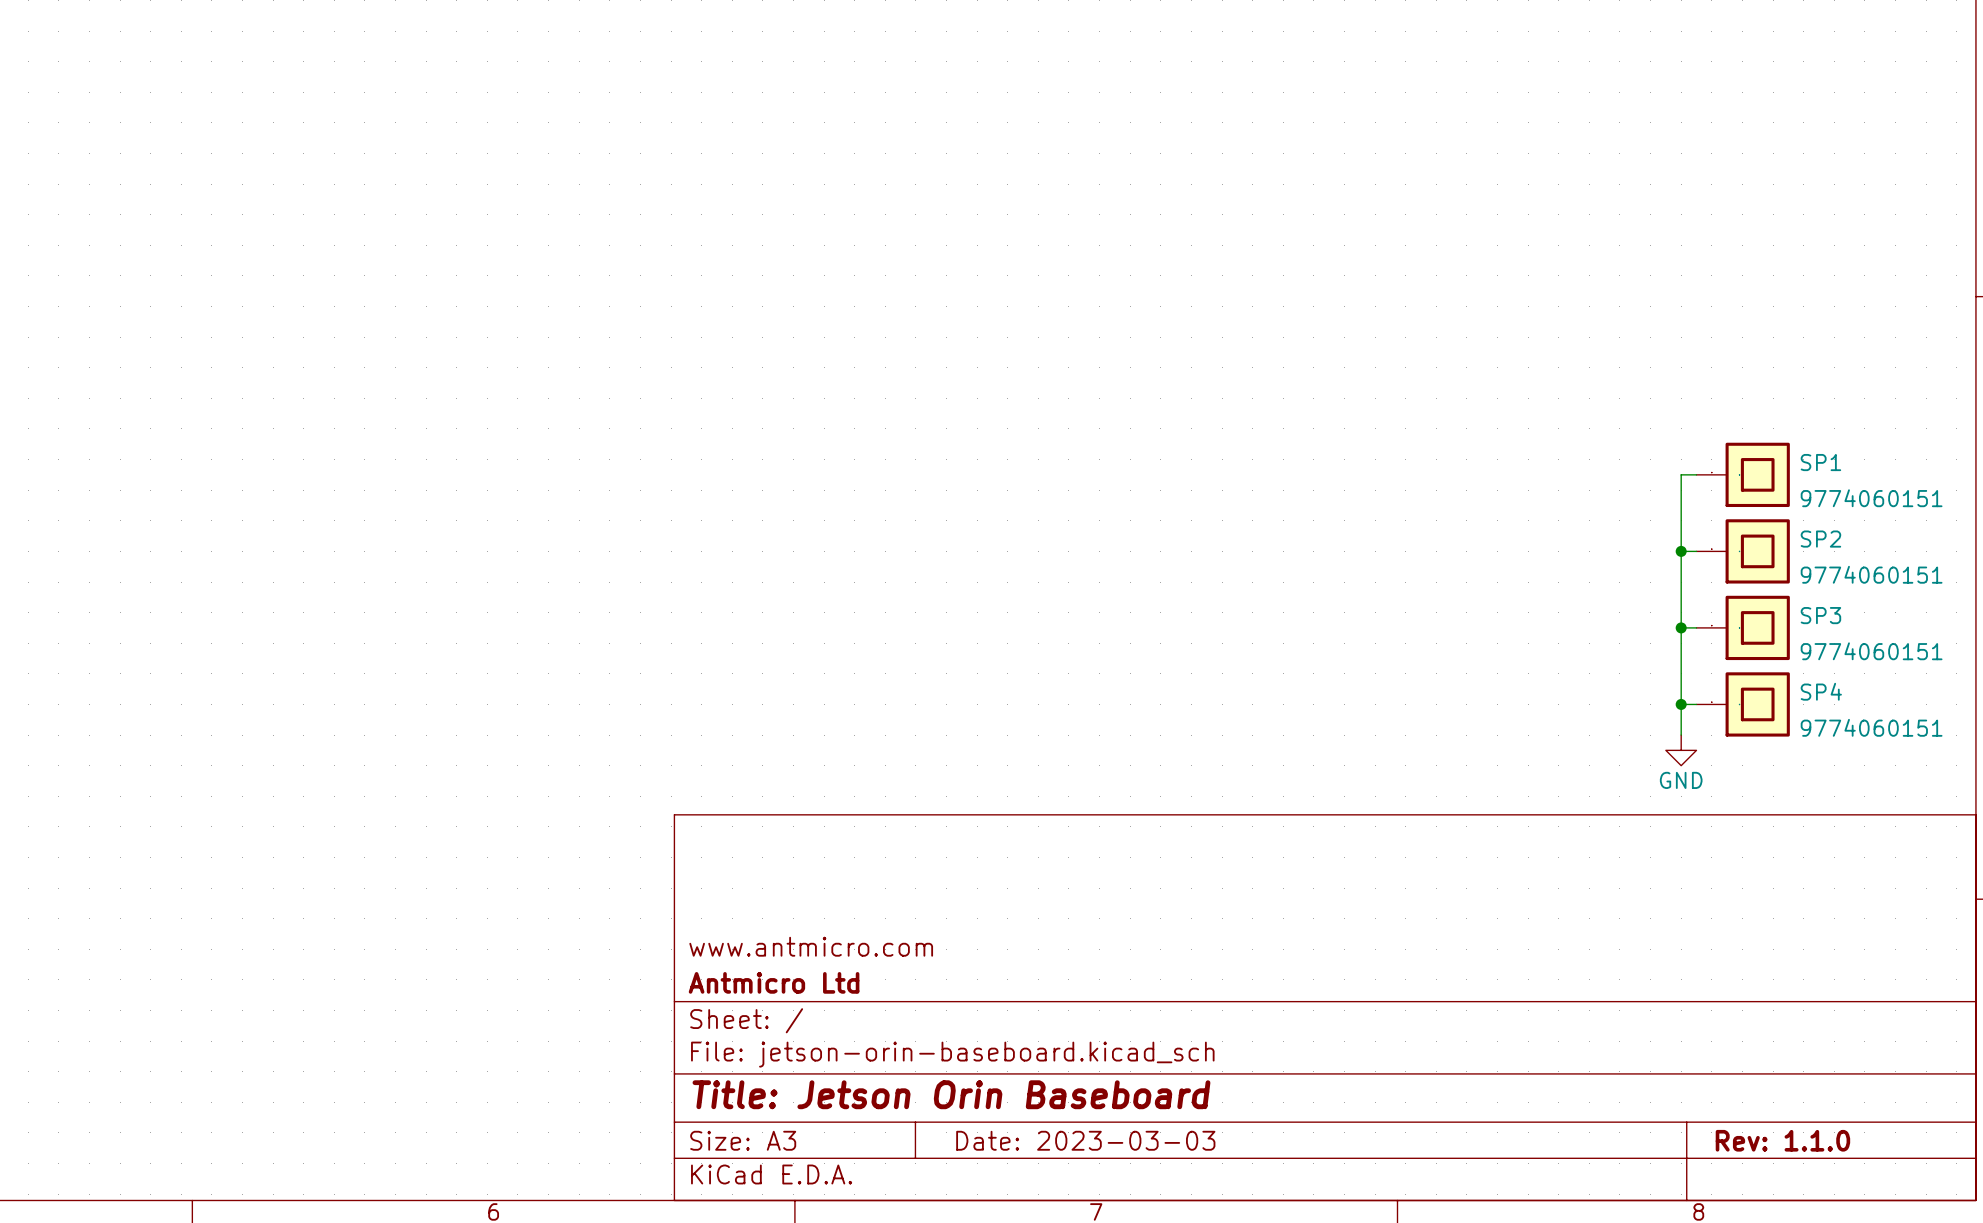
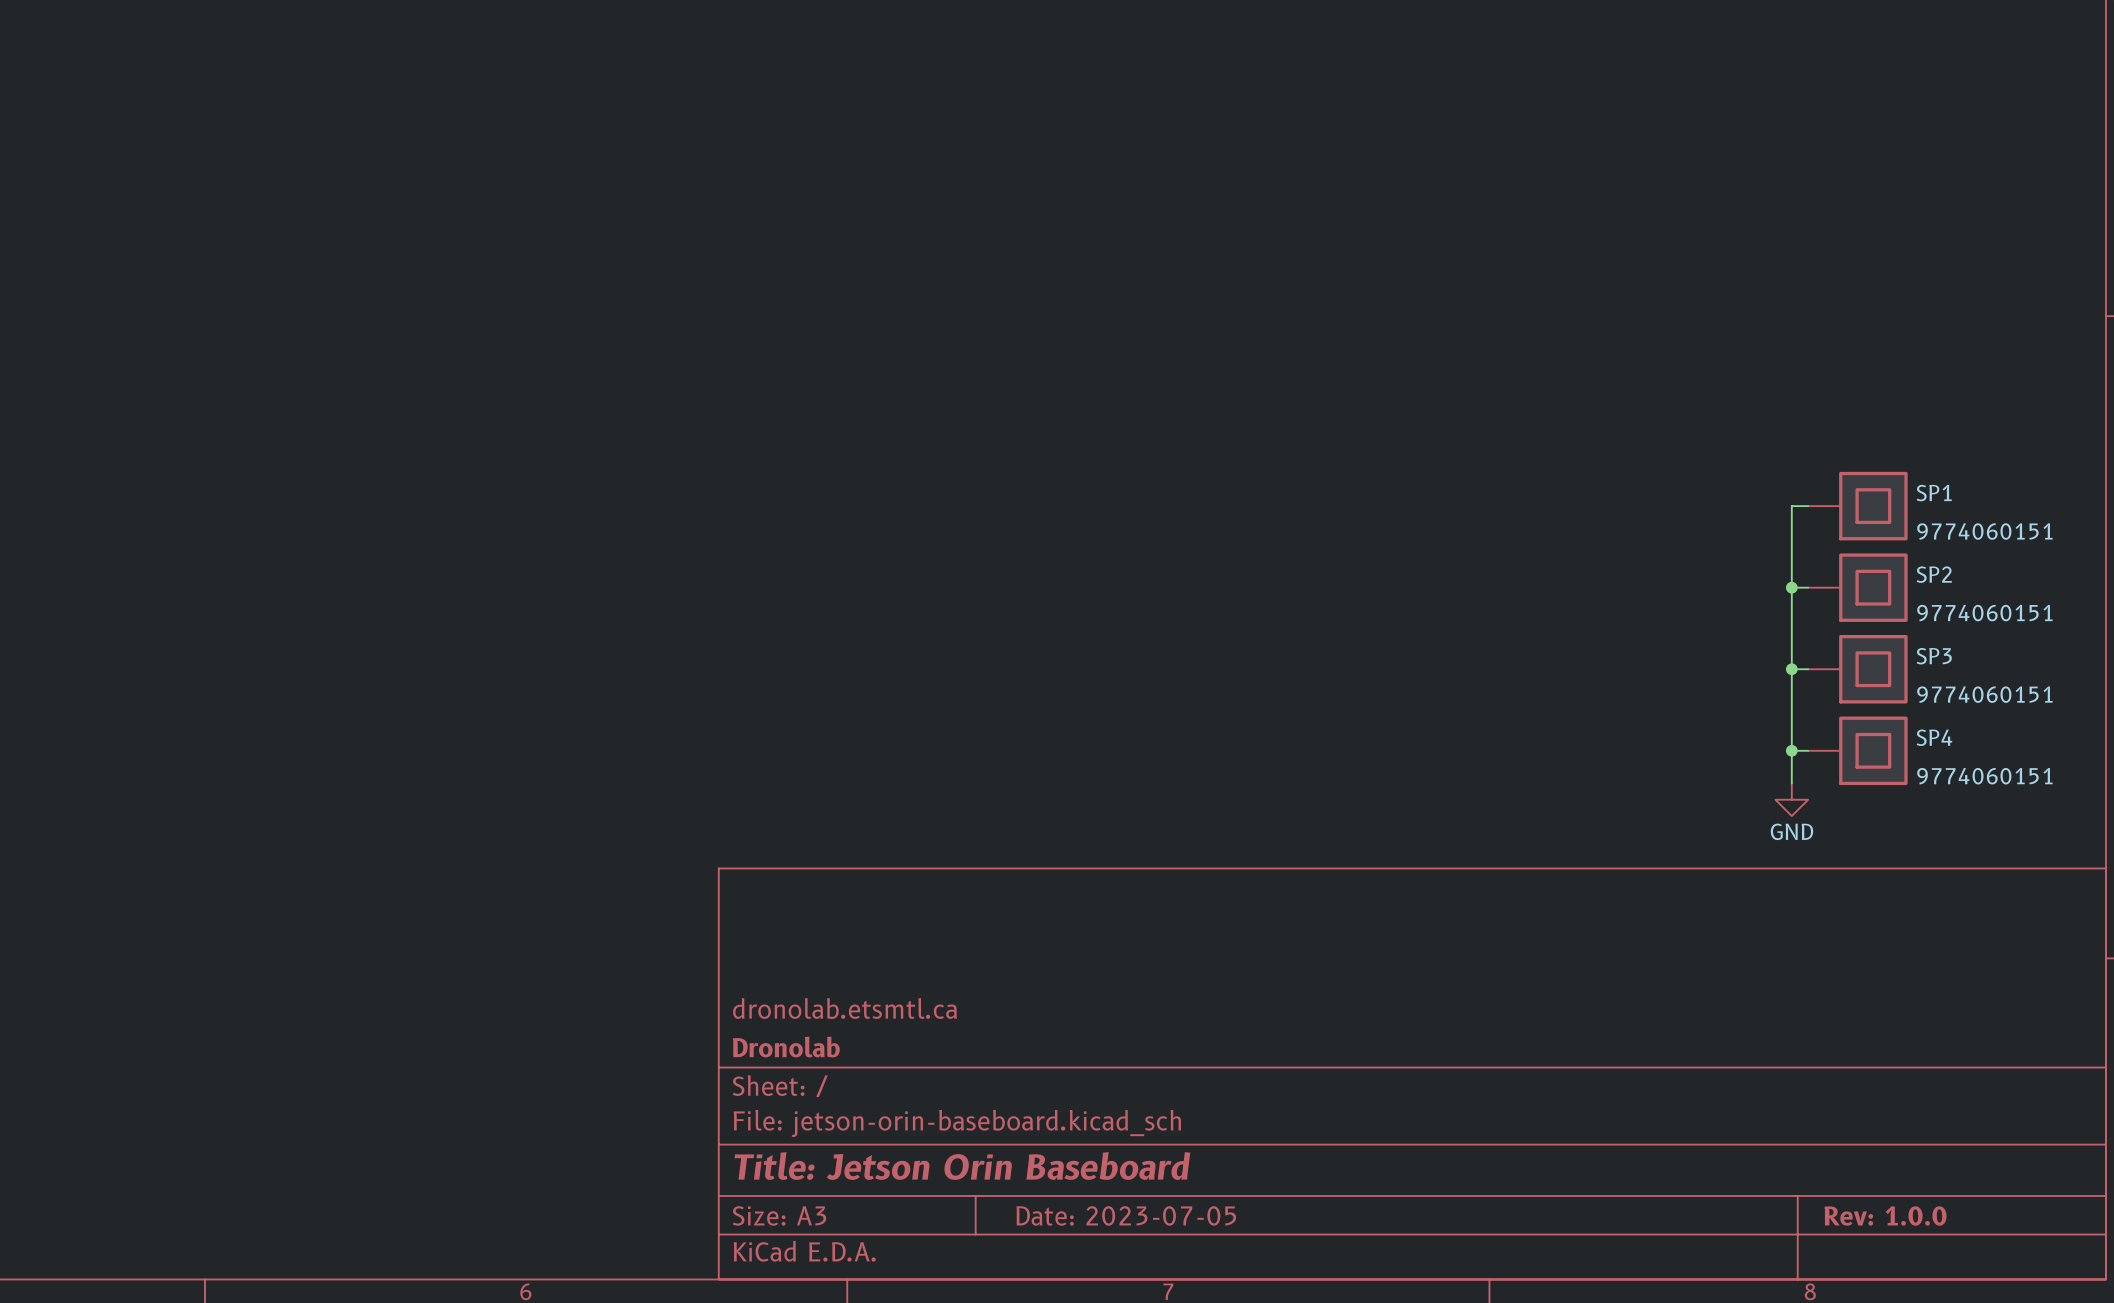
title block: www.antmicro.com (811, 946) -> dronolab.etsmtl.ca (844, 1008)
title block: Antmicro Ltd (774, 982) -> Dronolab (786, 1047)
title block: Date: 2023-03-03 (1085, 1140) -> Date: 2023-07-05 (1126, 1215)
title block: Rev: 1.1.0 (1782, 1140) -> Rev: 1.0.0 (1885, 1215)

